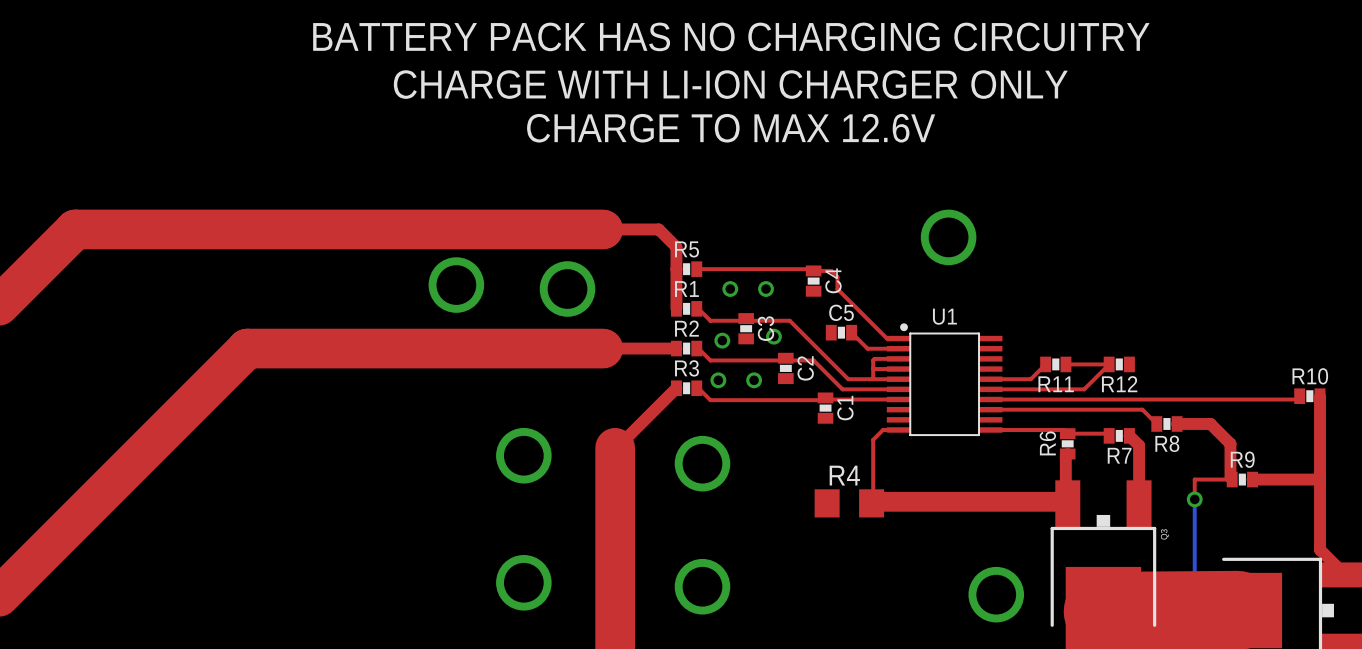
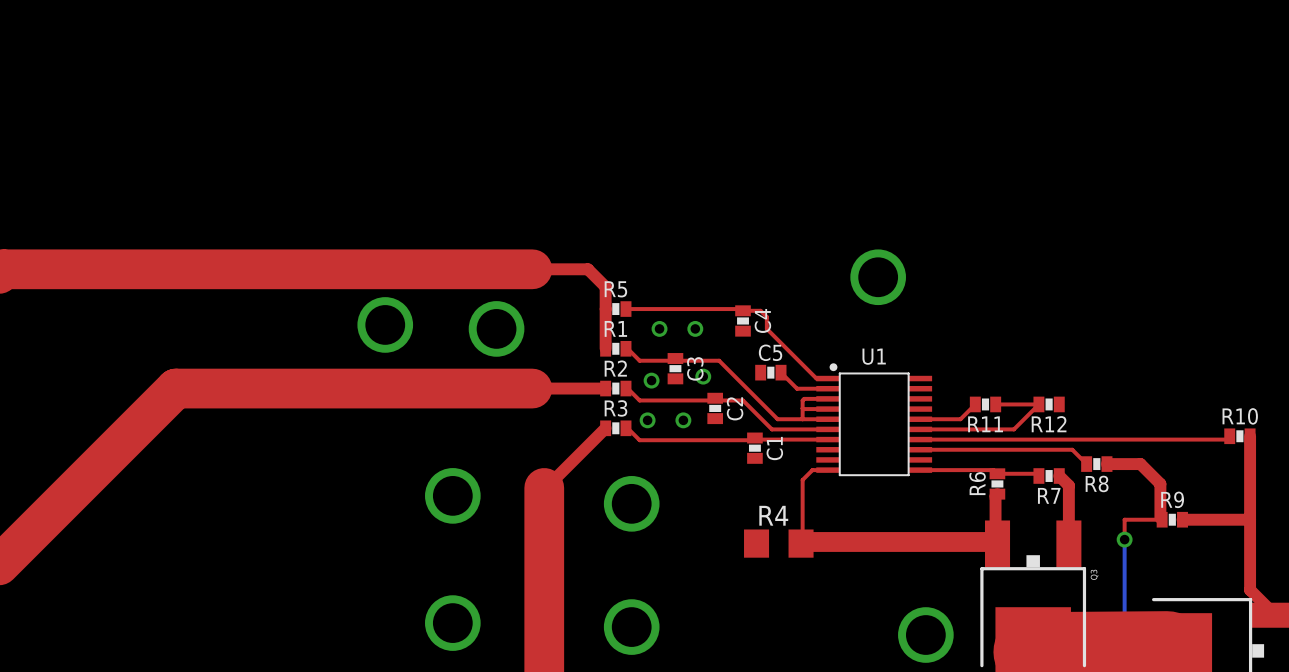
text: BATTERY PACK HAS NO CHARGING CIRCUITRY (731, 36) -> none
text: CHARGE WITH LI-ION CHARGER ONLY (730, 84) -> none
text: CHARGE TO MAX 12.6V (731, 128) -> none

